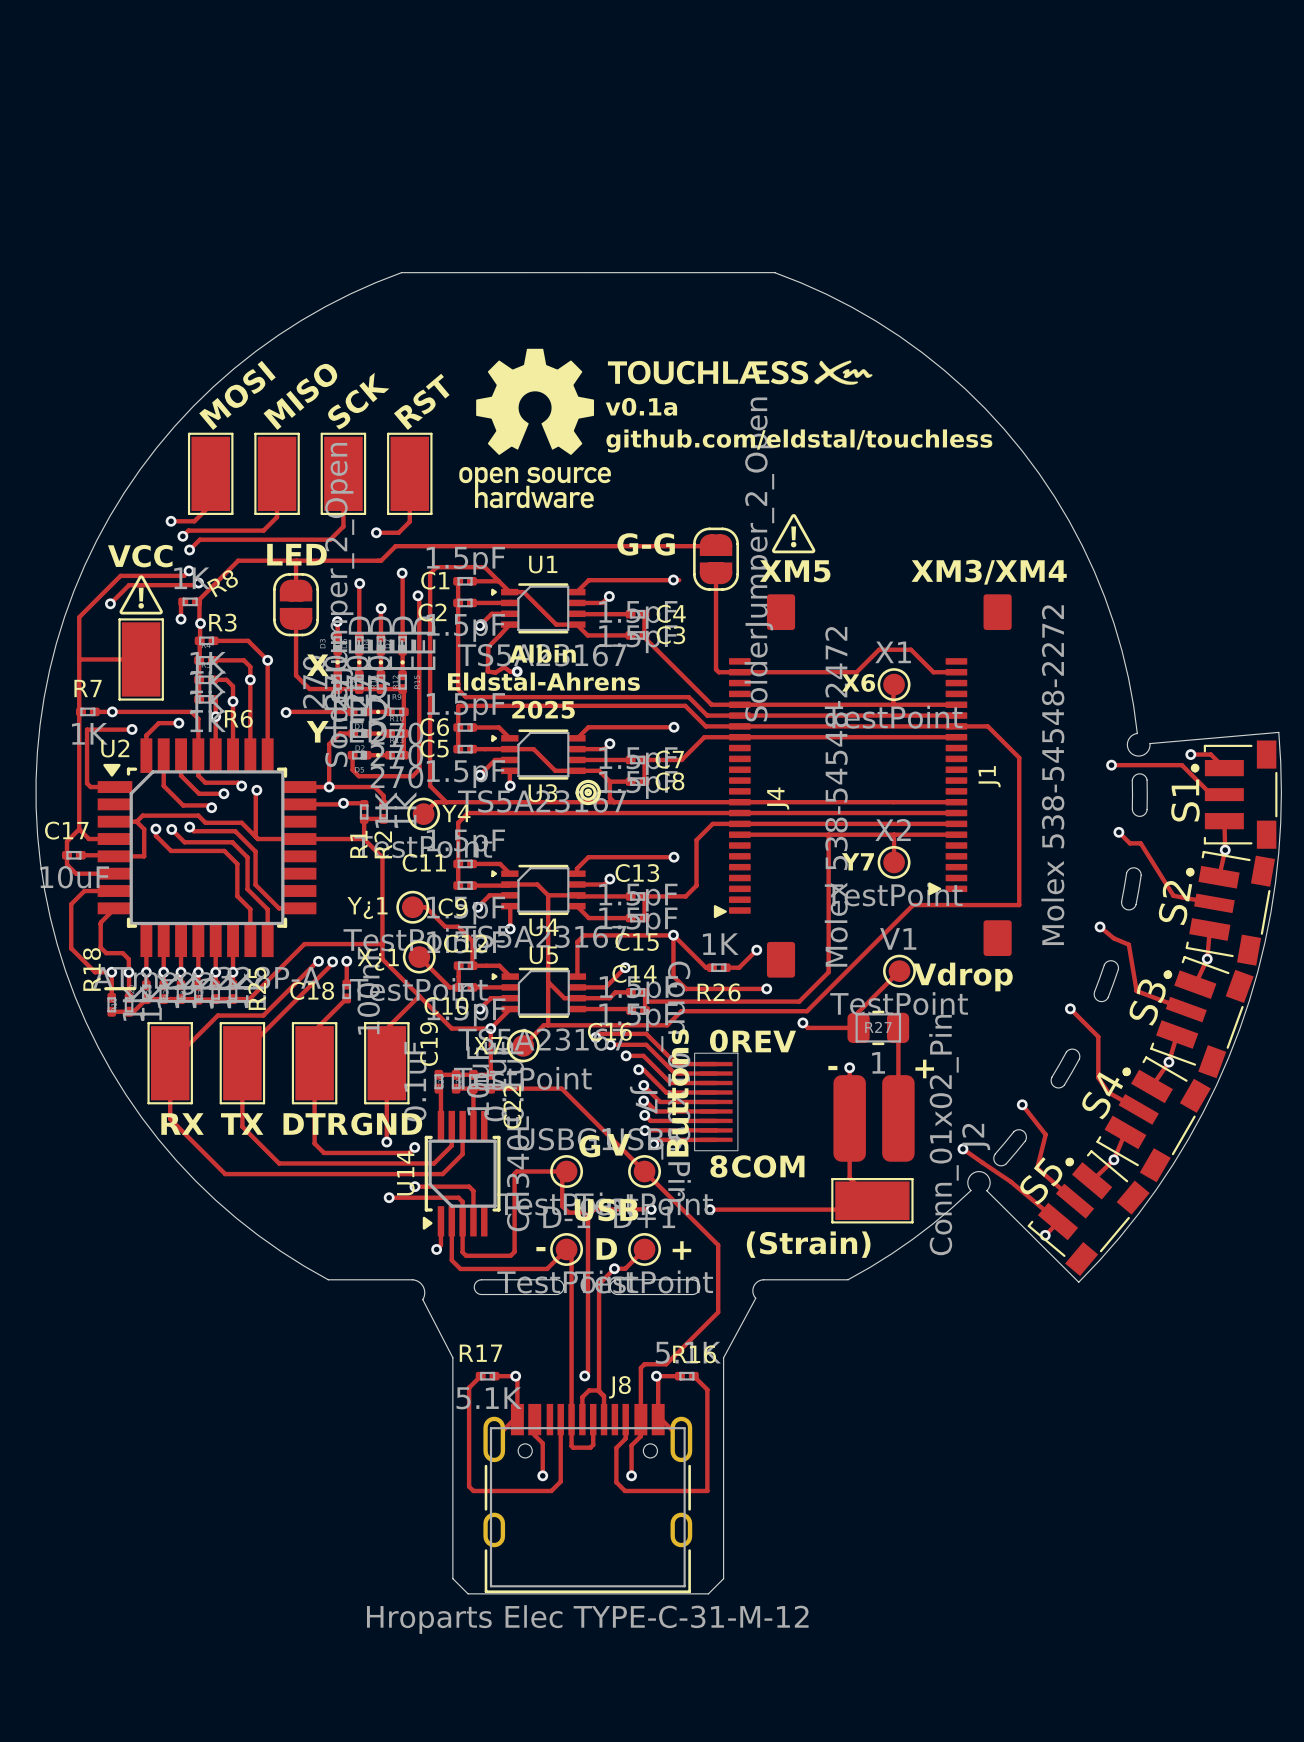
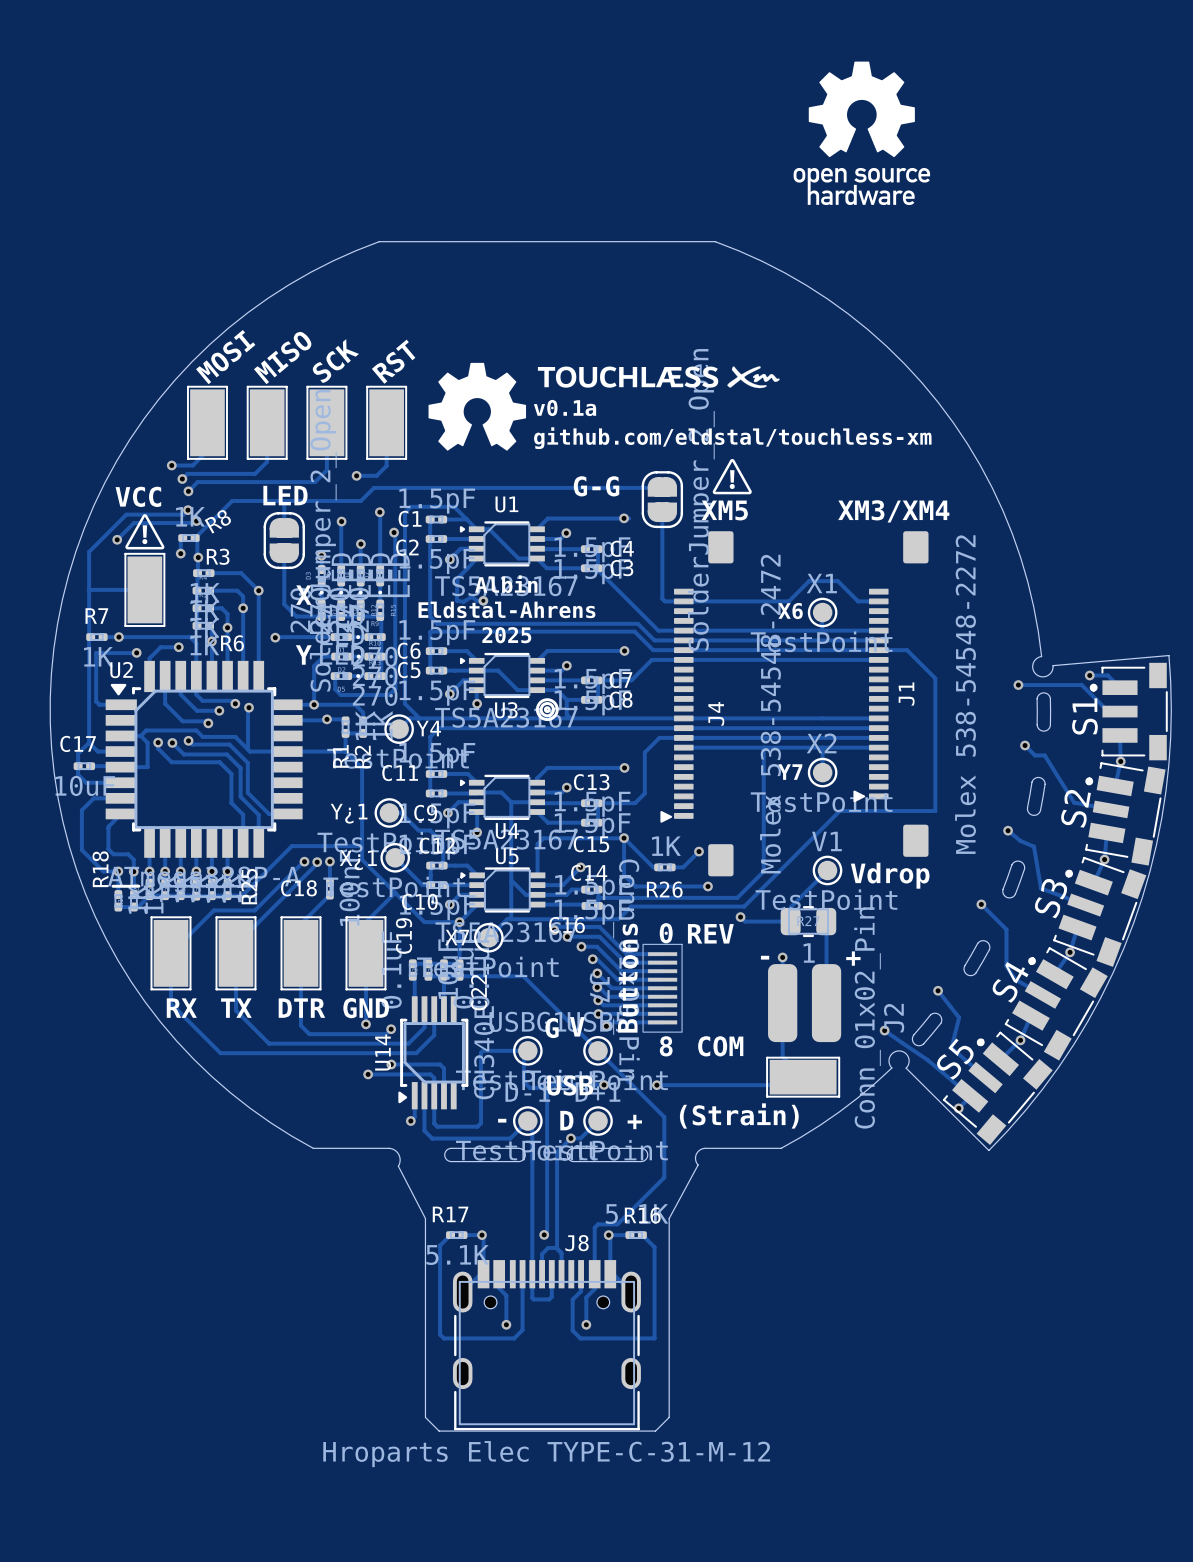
drawing: none -> [793, 61, 931, 206]
drawing: [459, 348, 611, 509] -> none
drawing: [770, 360, 809, 385] -> none
drawing position: (617, 372) -> (546, 377)
drawing position: (639, 372) -> (566, 377)
drawing position: (663, 372) -> (588, 377)
drawing position: (686, 372) -> (608, 377)
drawing position: (708, 372) -> (628, 377)
drawing position: (730, 372) -> (648, 377)
drawing position: (754, 372) -> (669, 377)
drawing position: (836, 372) -> (747, 377)
drawing position: (857, 373) -> (766, 378)
text position: v0.1a (641, 406) -> v0.1a (565, 407)
drawing: none -> [428, 362, 527, 451]
drawing: none -> [684, 366, 719, 388]
text: github.com/eldstal/touchless (799, 441) -> none
drawing position: (511, 474) -> (840, 175)
drawing position: (533, 475) -> (860, 175)
drawing position: (564, 475) -> (887, 175)
drawing position: (590, 475) -> (911, 175)
drawing position: (481, 487) -> (813, 186)
text: none -> github.com/eldstal/touchless-xm (732, 438)
drawing position: (523, 496) -> (851, 194)
drawing position: (542, 500) -> (868, 197)

